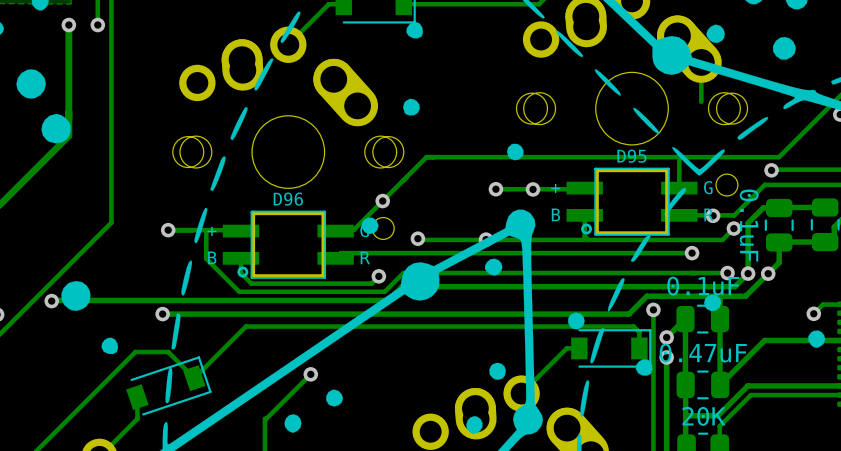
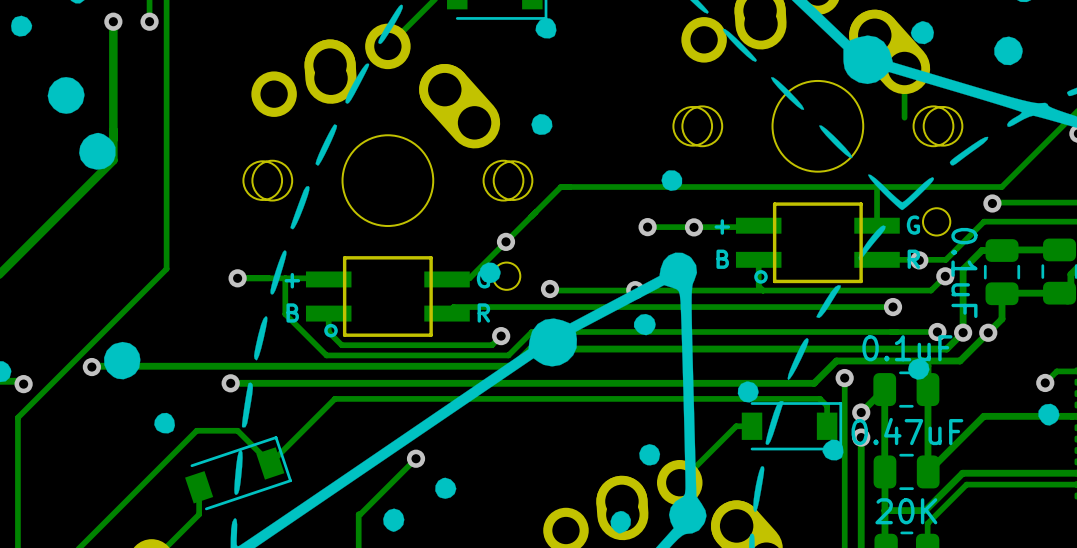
D95: (632, 201) -> none
part: none -> (817, 243)
D96: (288, 244) -> none
part: none -> (387, 296)

